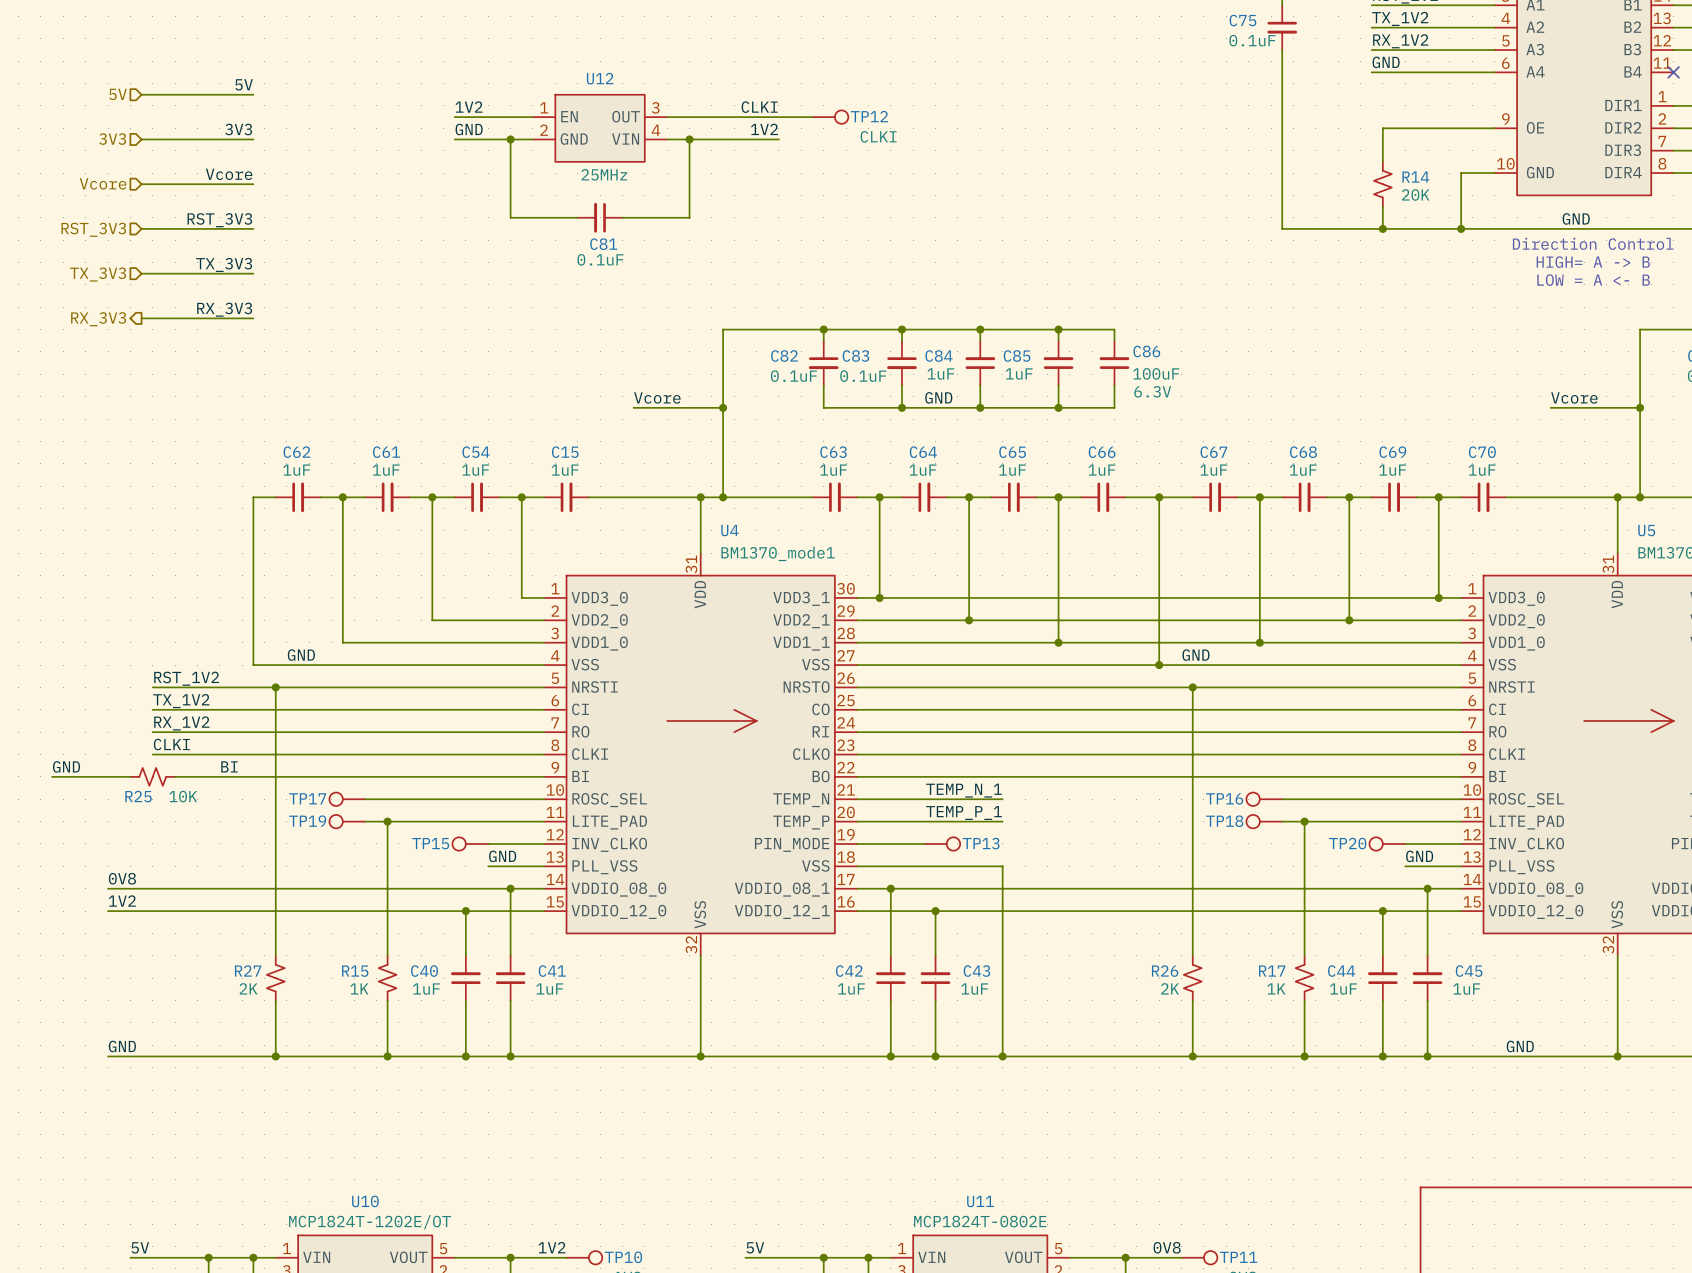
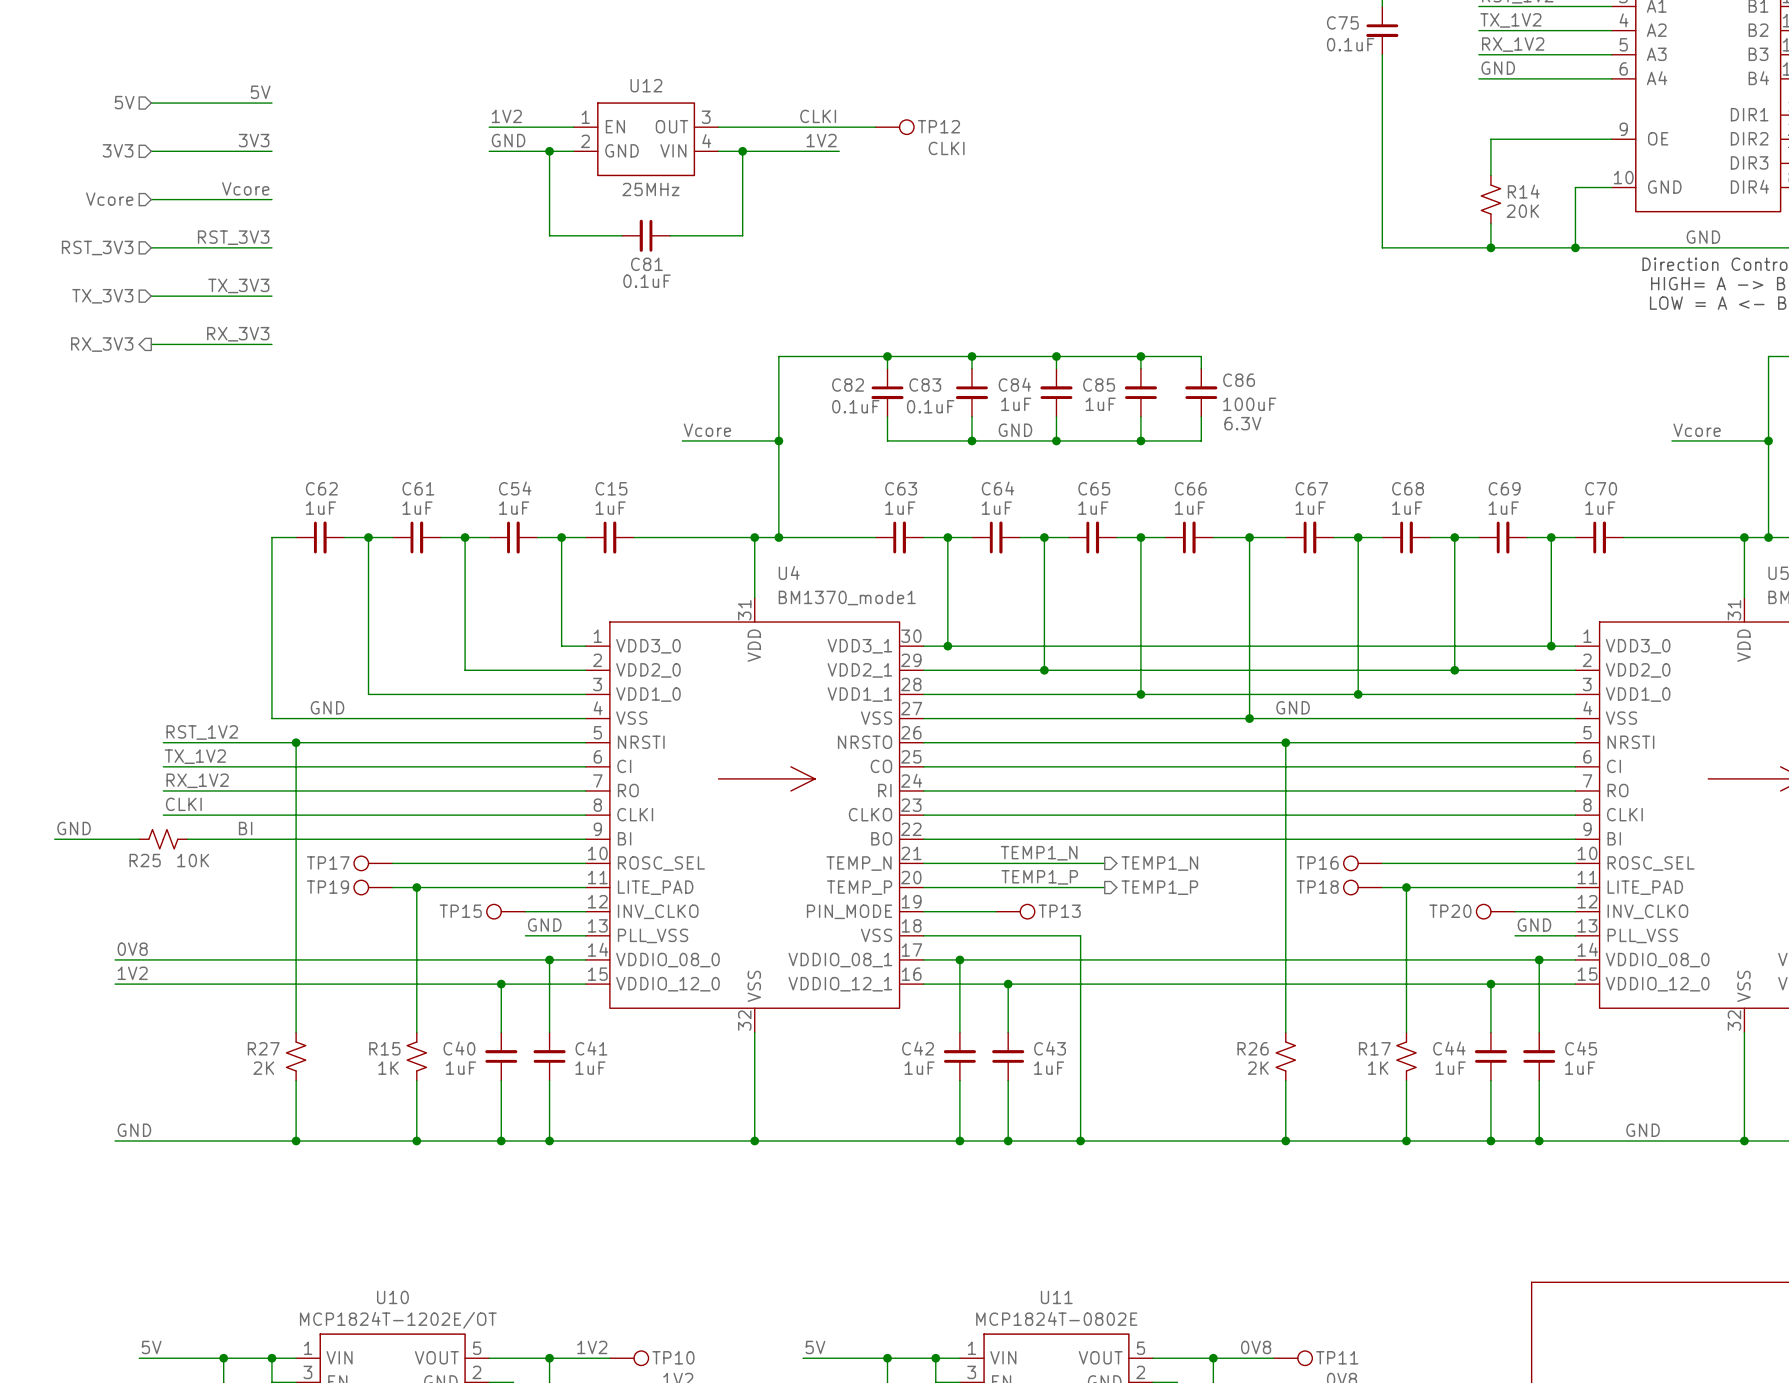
label: TEMP_N_1 (964, 790) -> TEMP1_N (1039, 853)
wire: none -> (1080, 863) (1104, 863)
hierarchical label: none -> TEMP1_N (1159, 863)
label: TEMP_P_1 (964, 813) -> TEMP1_P (1039, 877)
wire: none -> (1080, 887) (1104, 887)
hierarchical label: none -> TEMP1_P (1159, 887)

